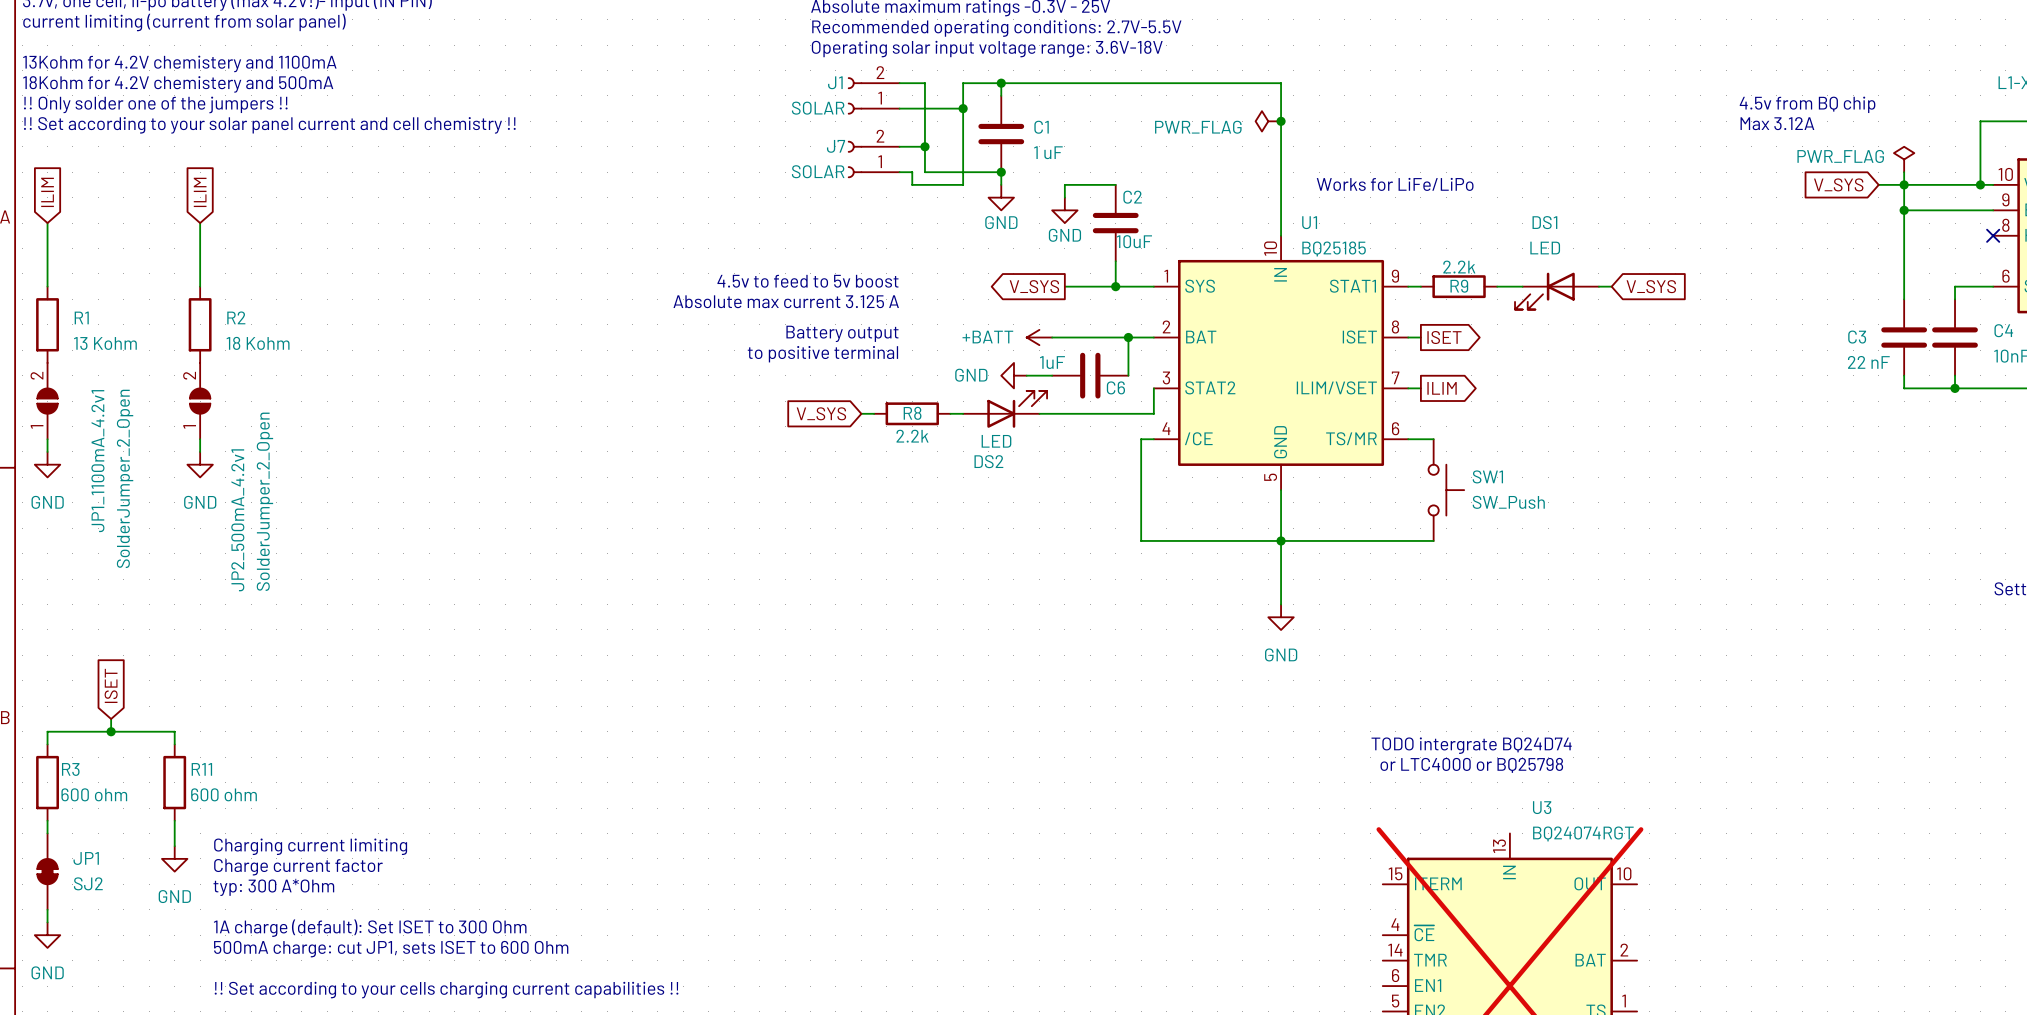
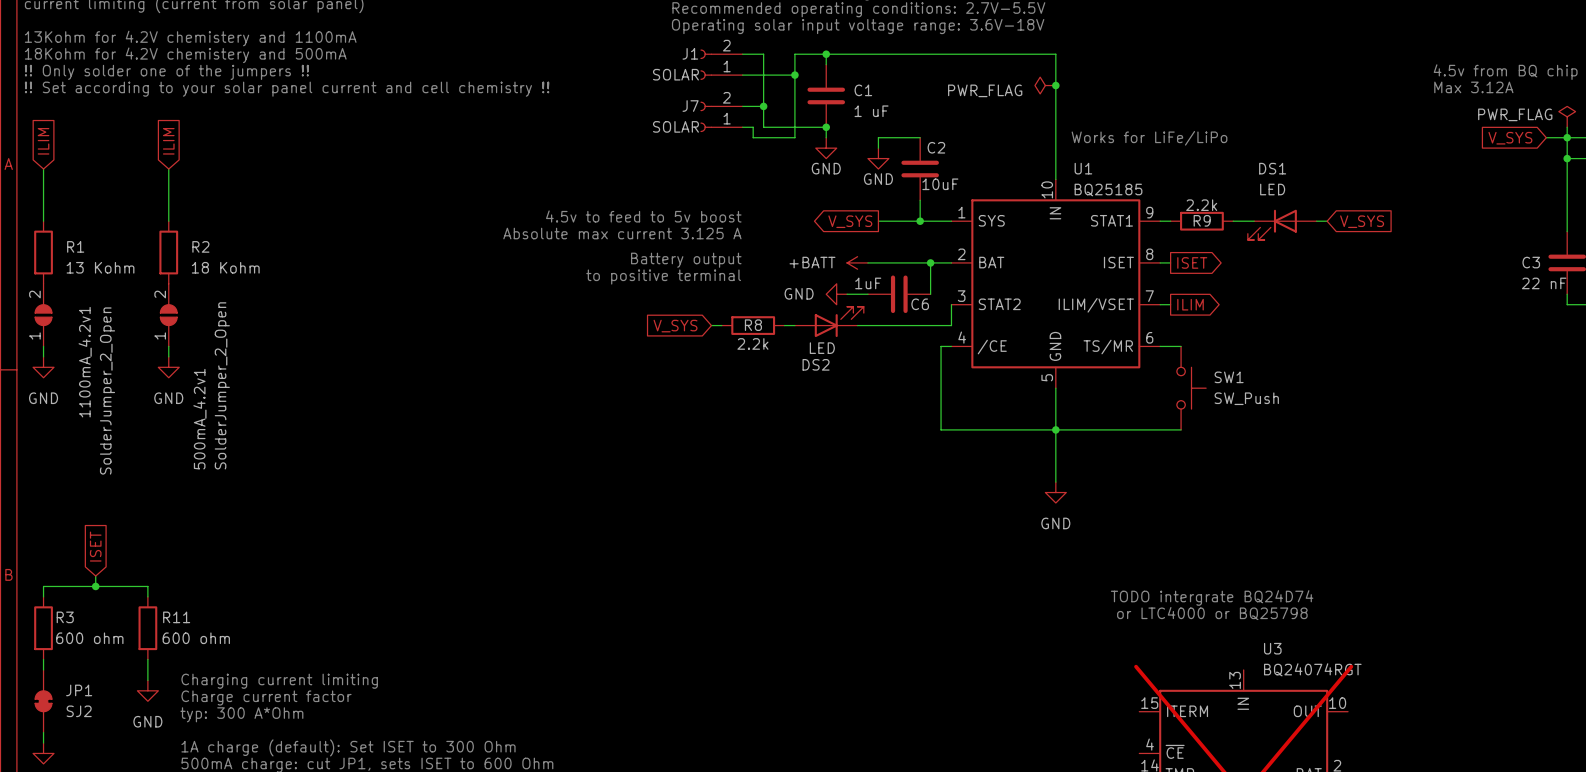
JP1_1100mA_4.2v1 name: JP1_1100mA_4.2v1 (97, 461) -> 1100mA_4.2v1 (85, 362)
JP2_500mA_4.2v1 name: JP2_500mA_4.2v1 (237, 520) -> 500mA_4.2v1 (199, 419)

